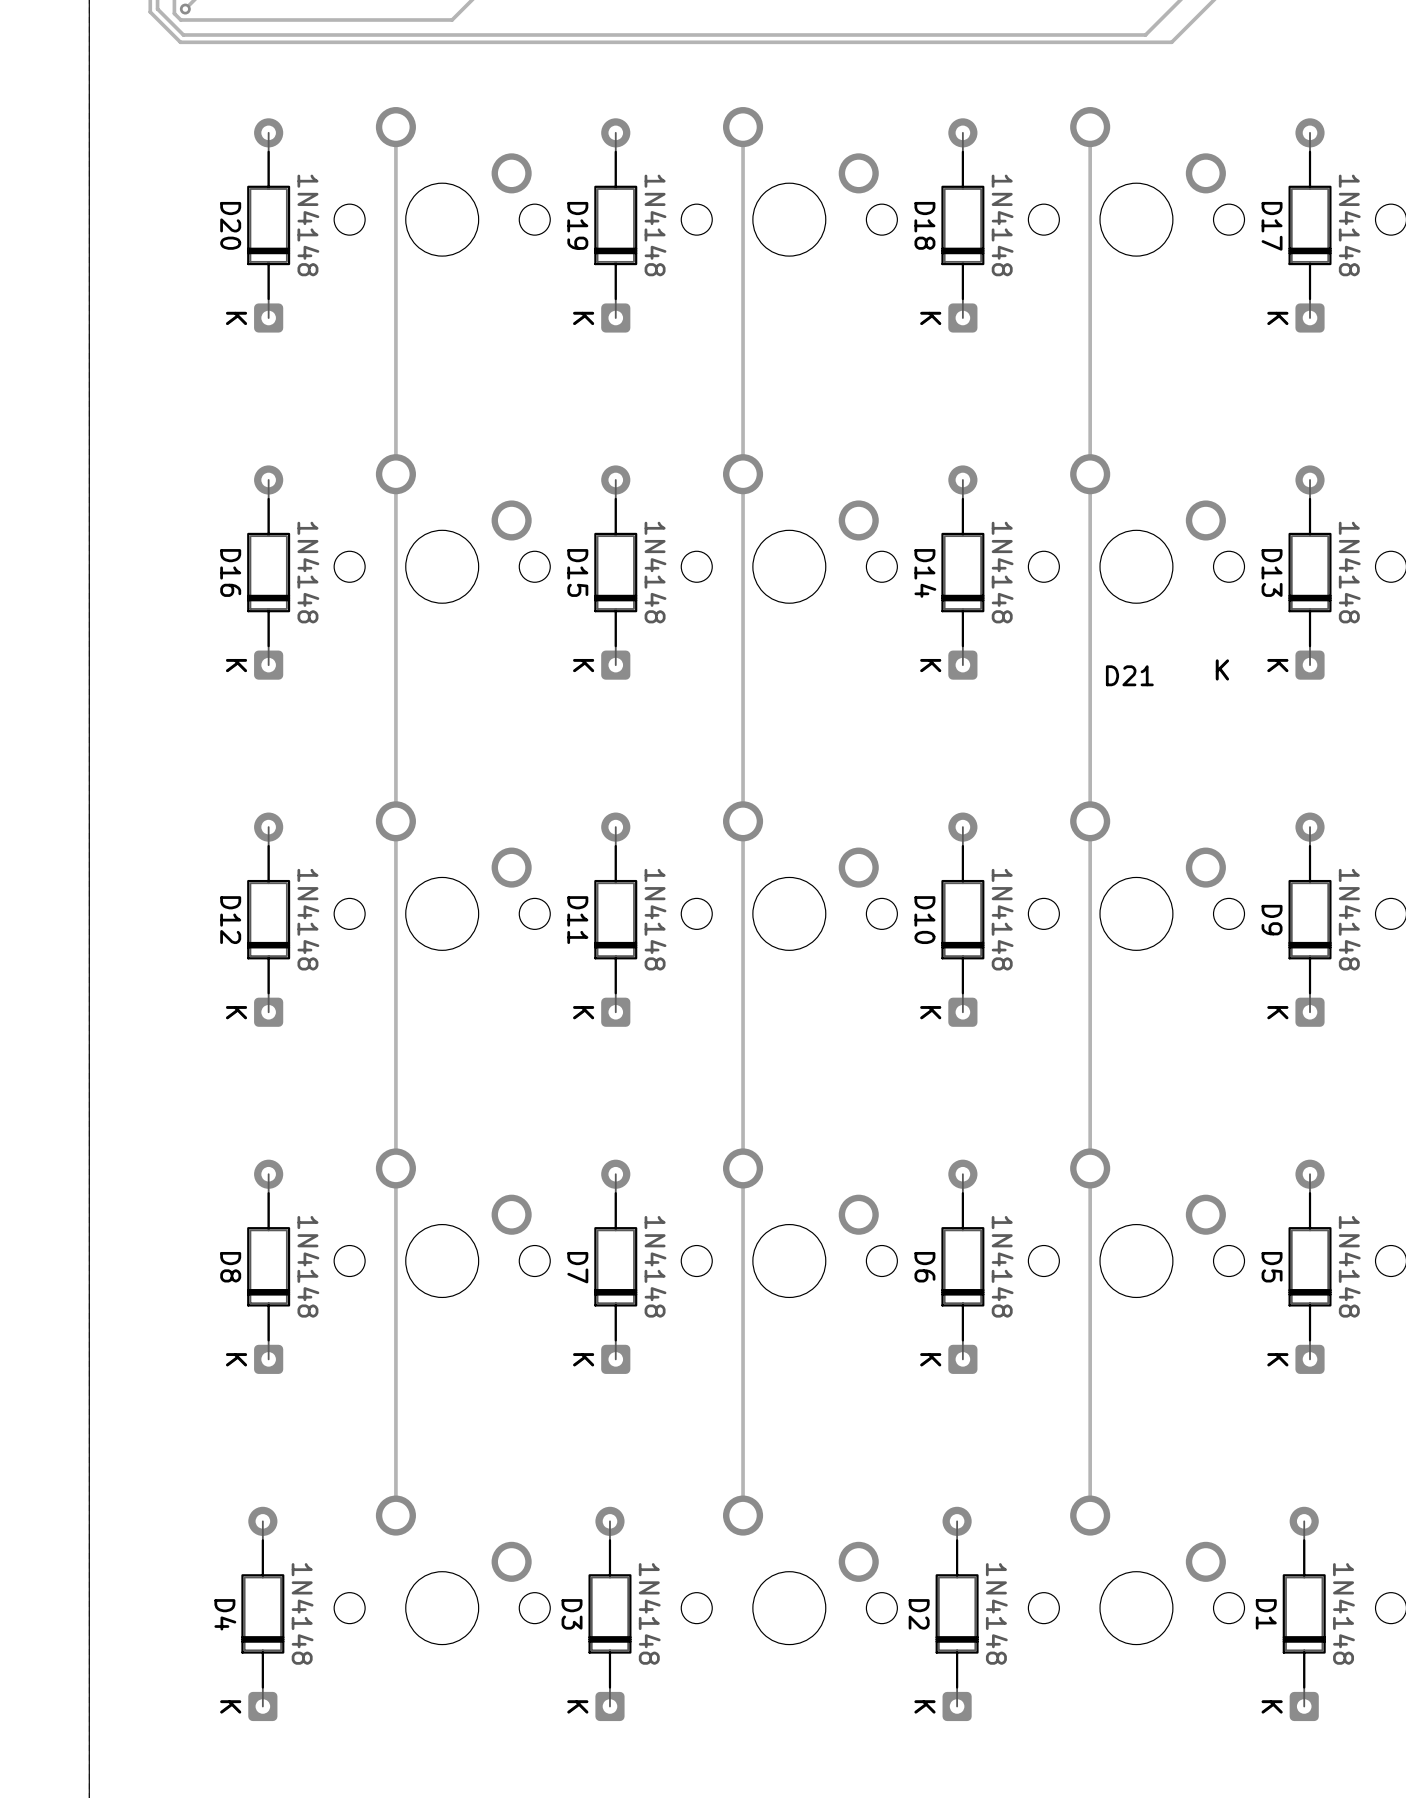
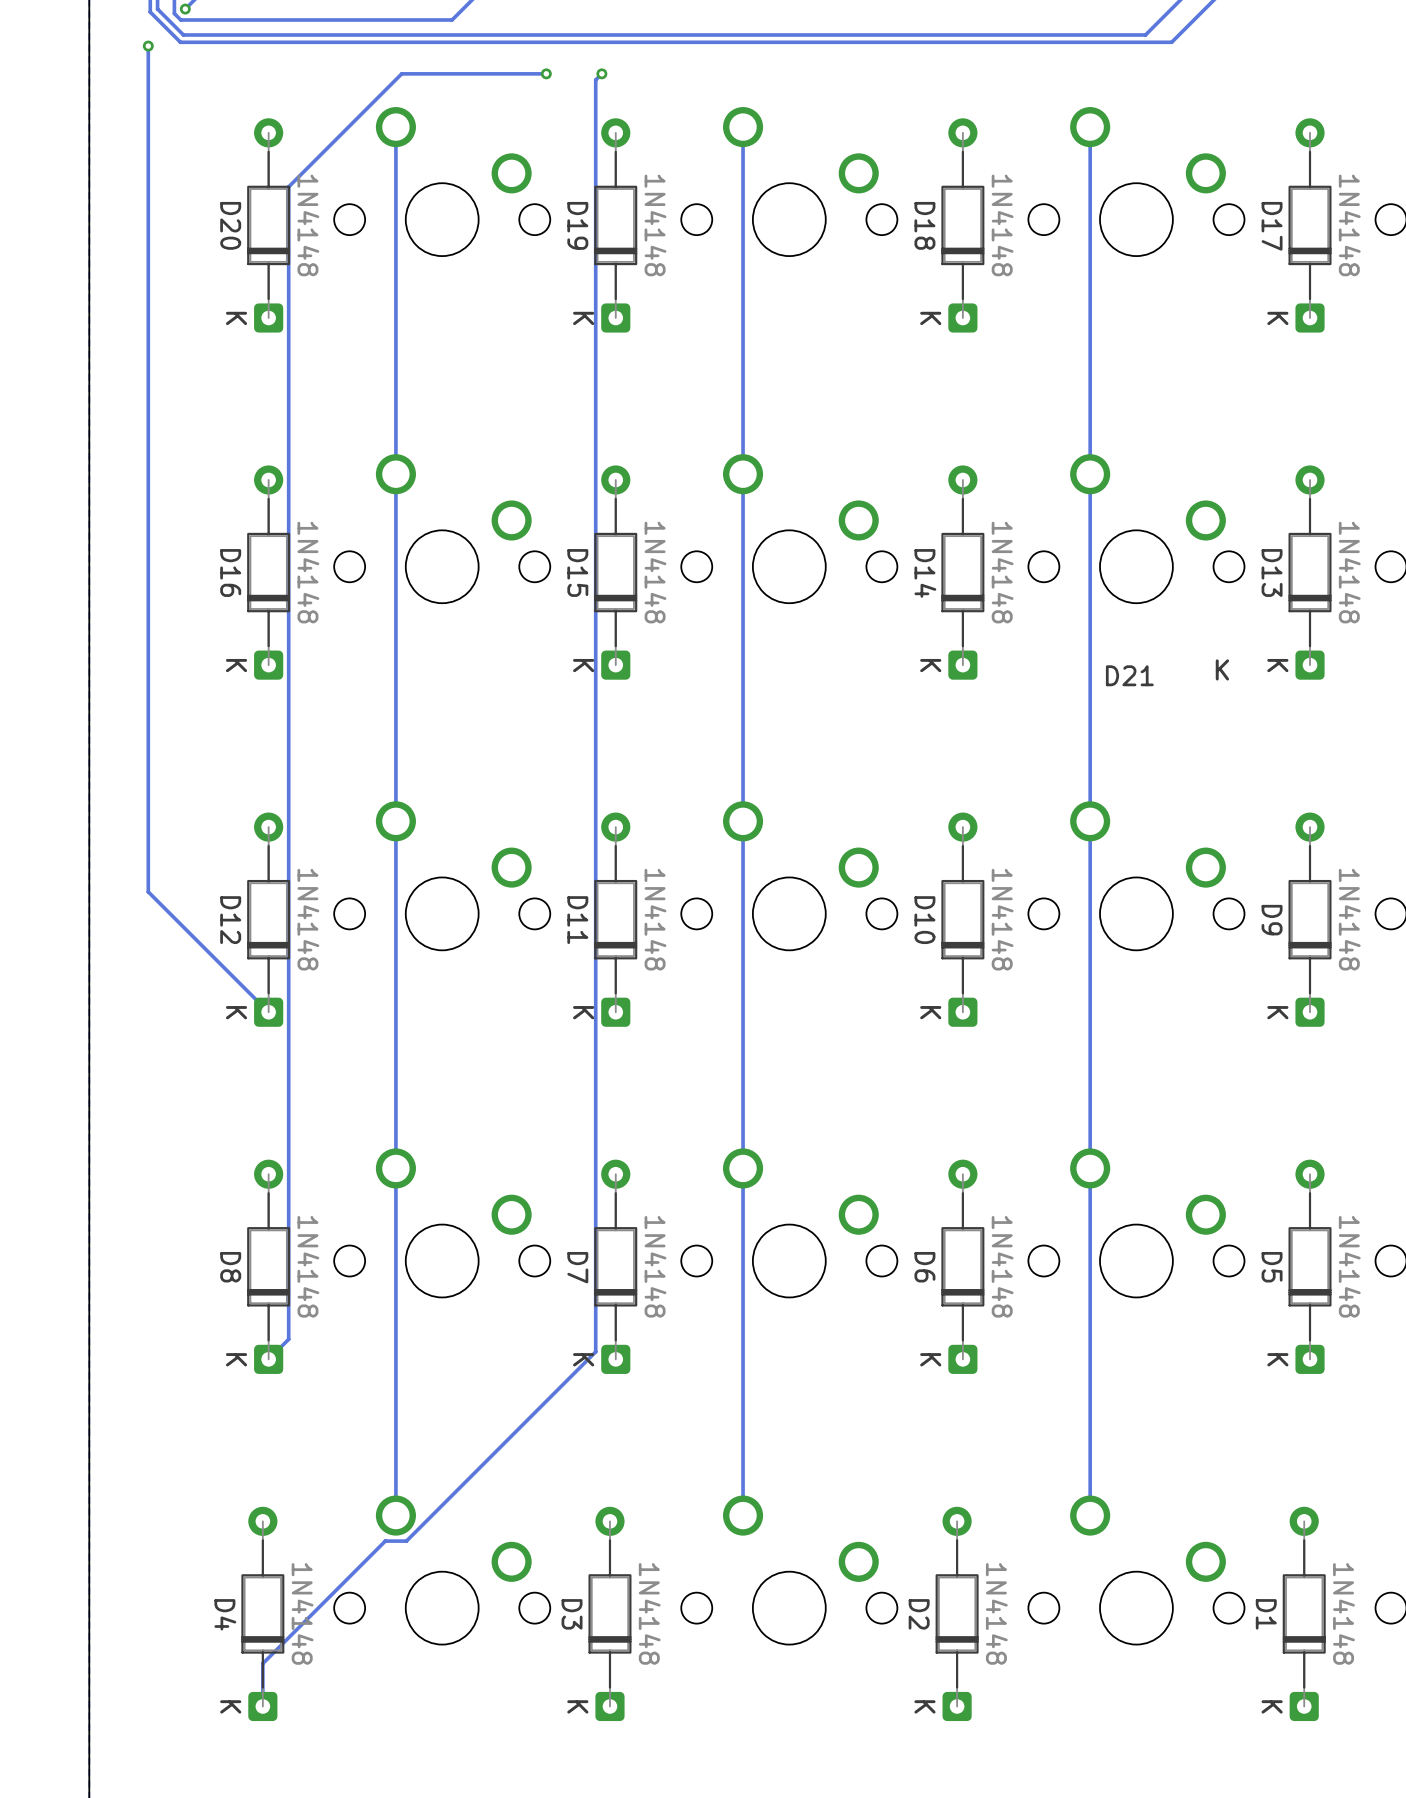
track: none -> (148, 46) (148, 891) (268, 1012)
via: none -> (148, 46)
track: none -> (546, 73) (401, 73) (288, 186) (288, 1339) (268, 1359)
via: none -> (546, 73)
track: none -> (601, 73) (595, 80) (595, 1351) (406, 1541) (385, 1541) (262, 1663) (262, 1706)
via: none -> (601, 73)

